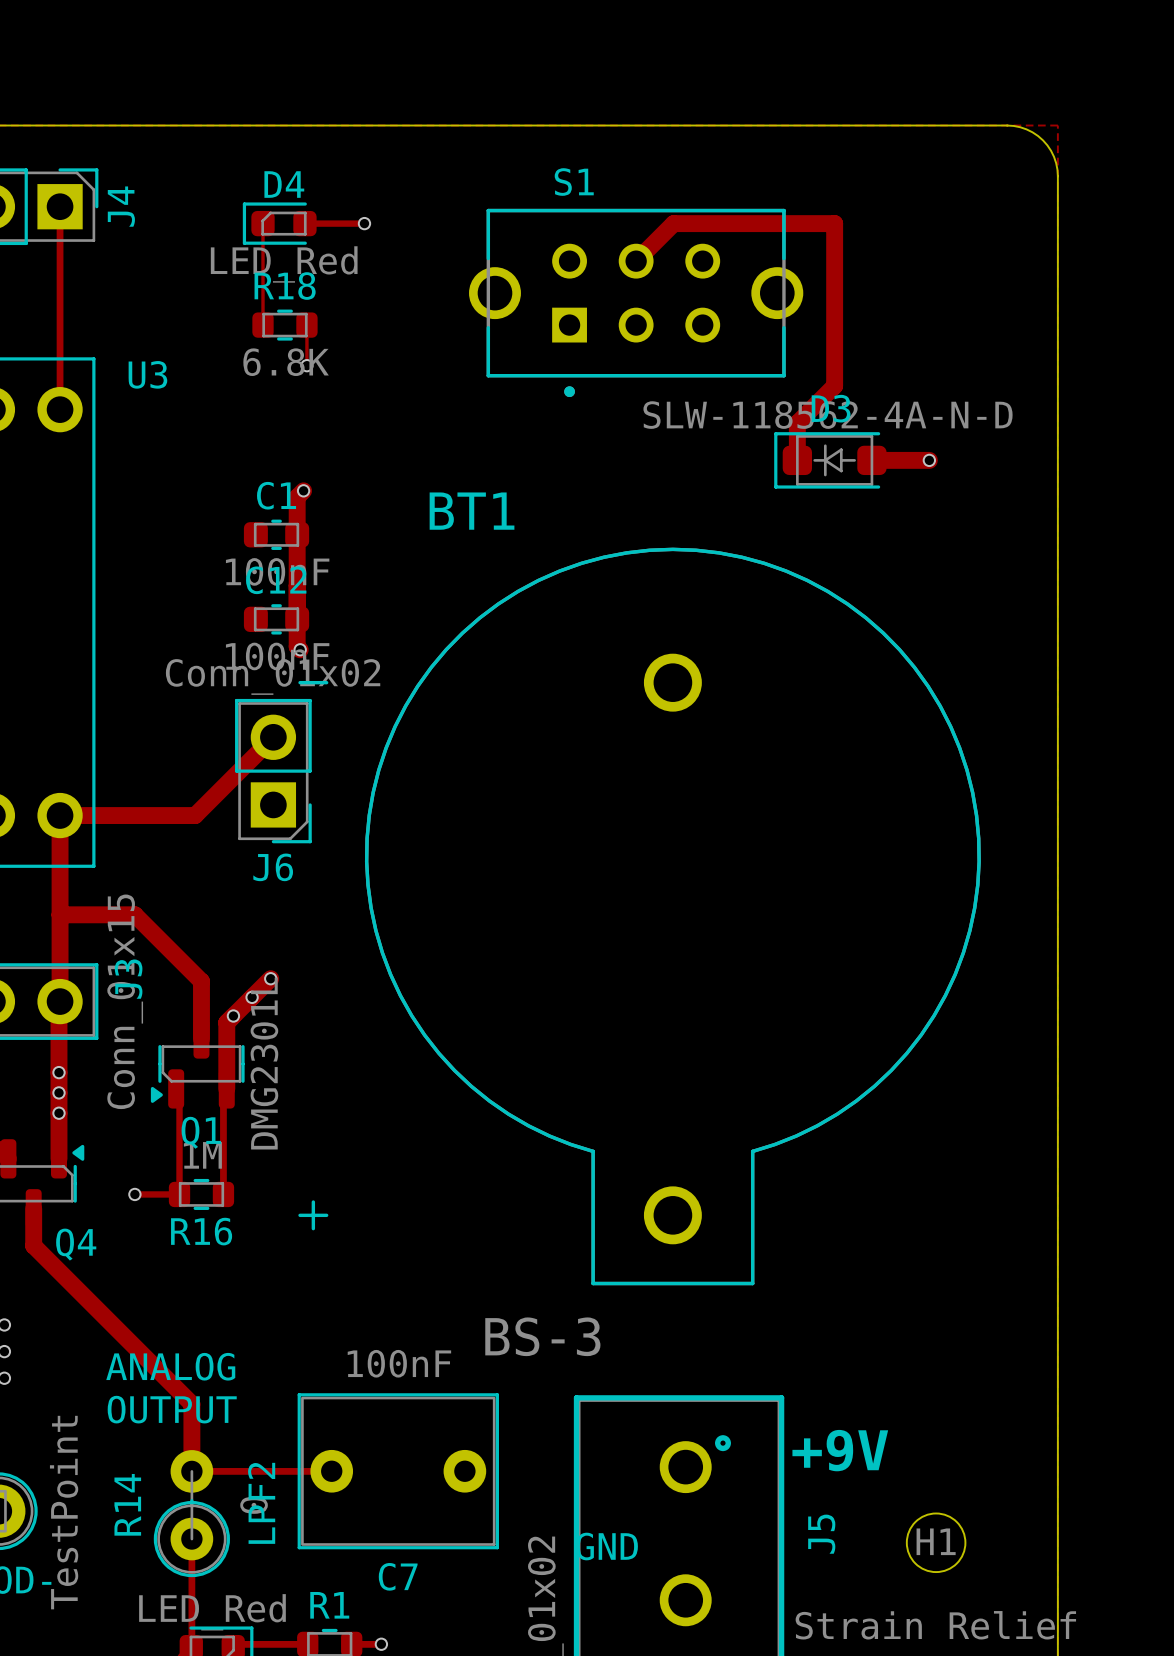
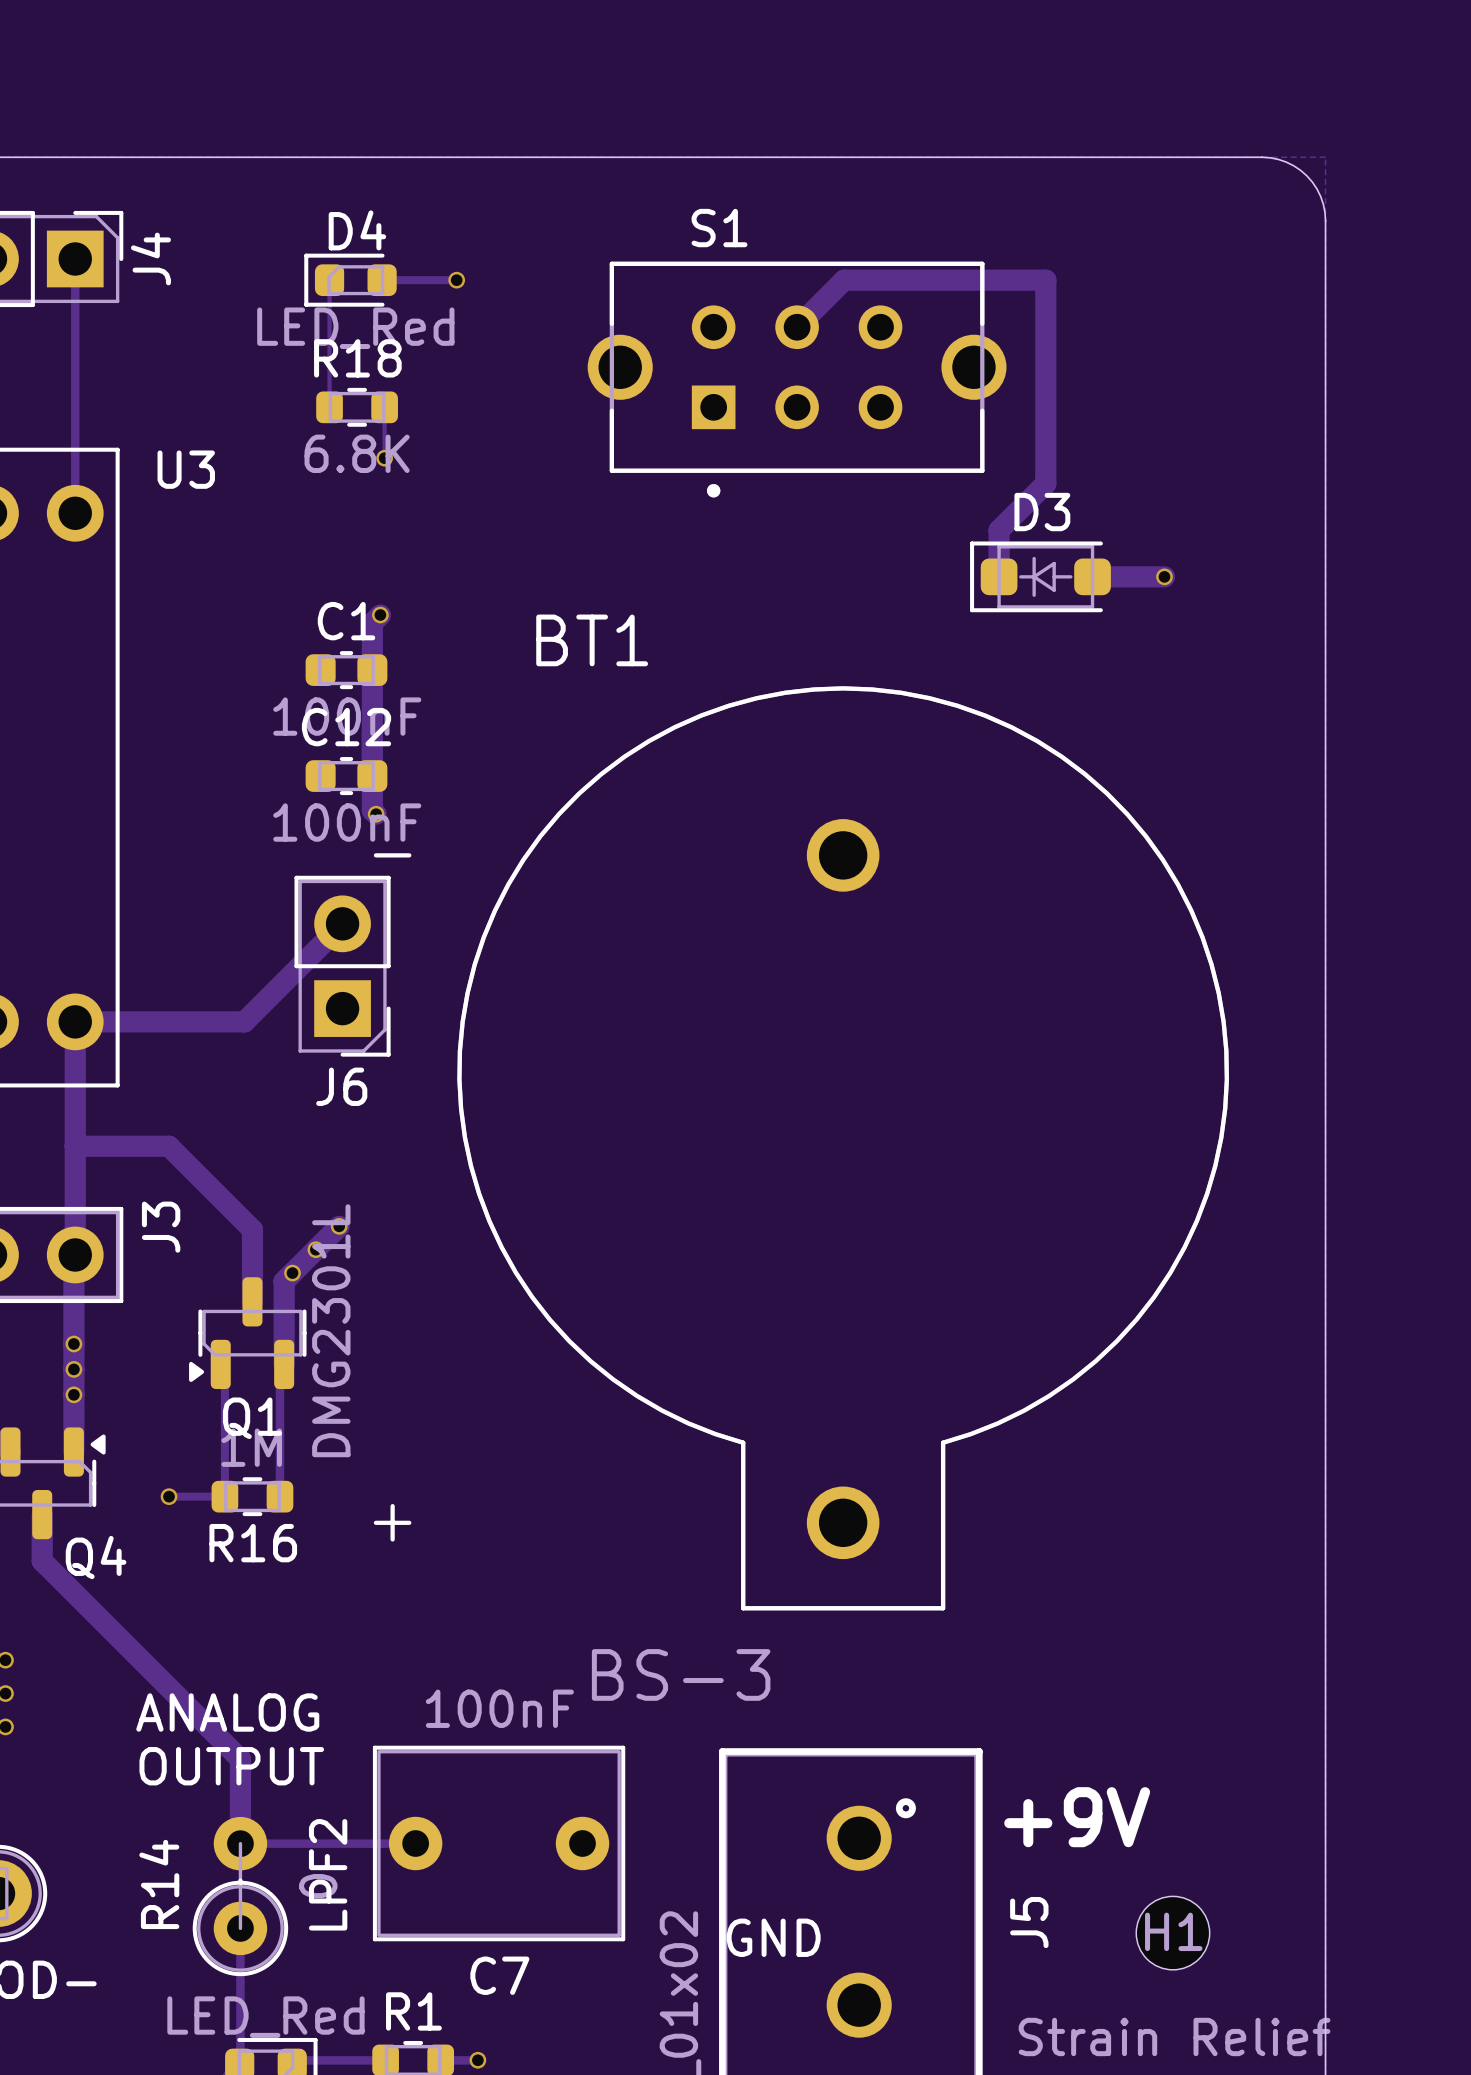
S1 value: SLW-118562-4A-N-D (828, 415) -> none
J6 value: Conn_01x02 (273, 676) -> none
J3 value: Conn_01x15 (125, 1001) -> none
part value: TestPoint (64, 1512) -> none

